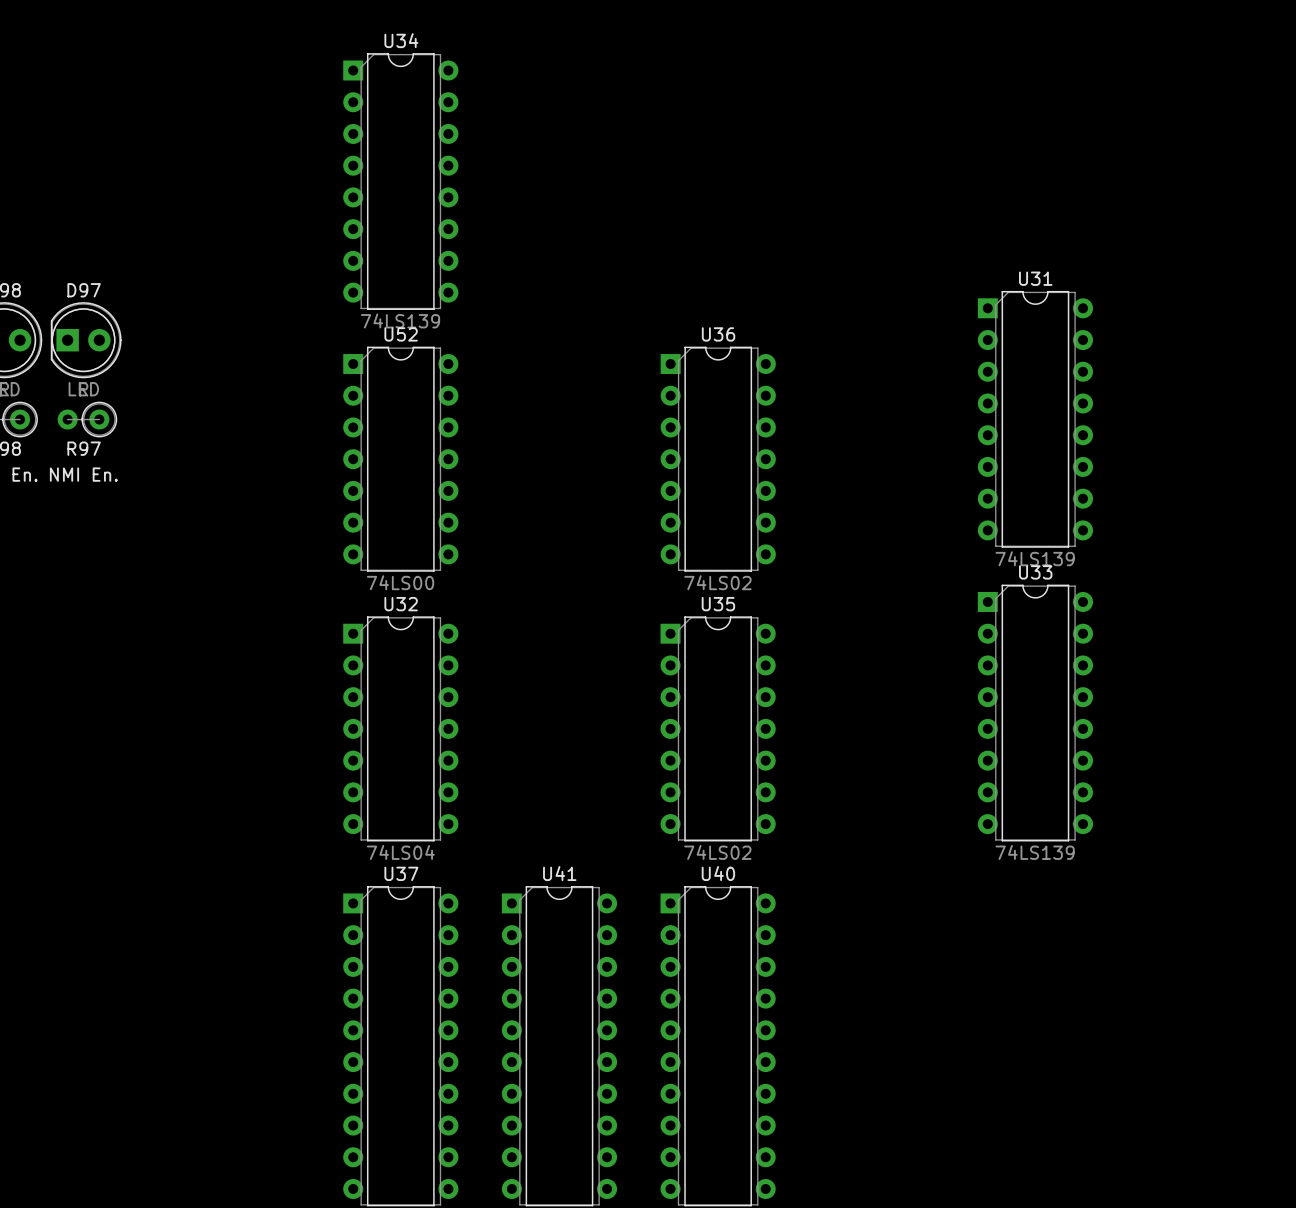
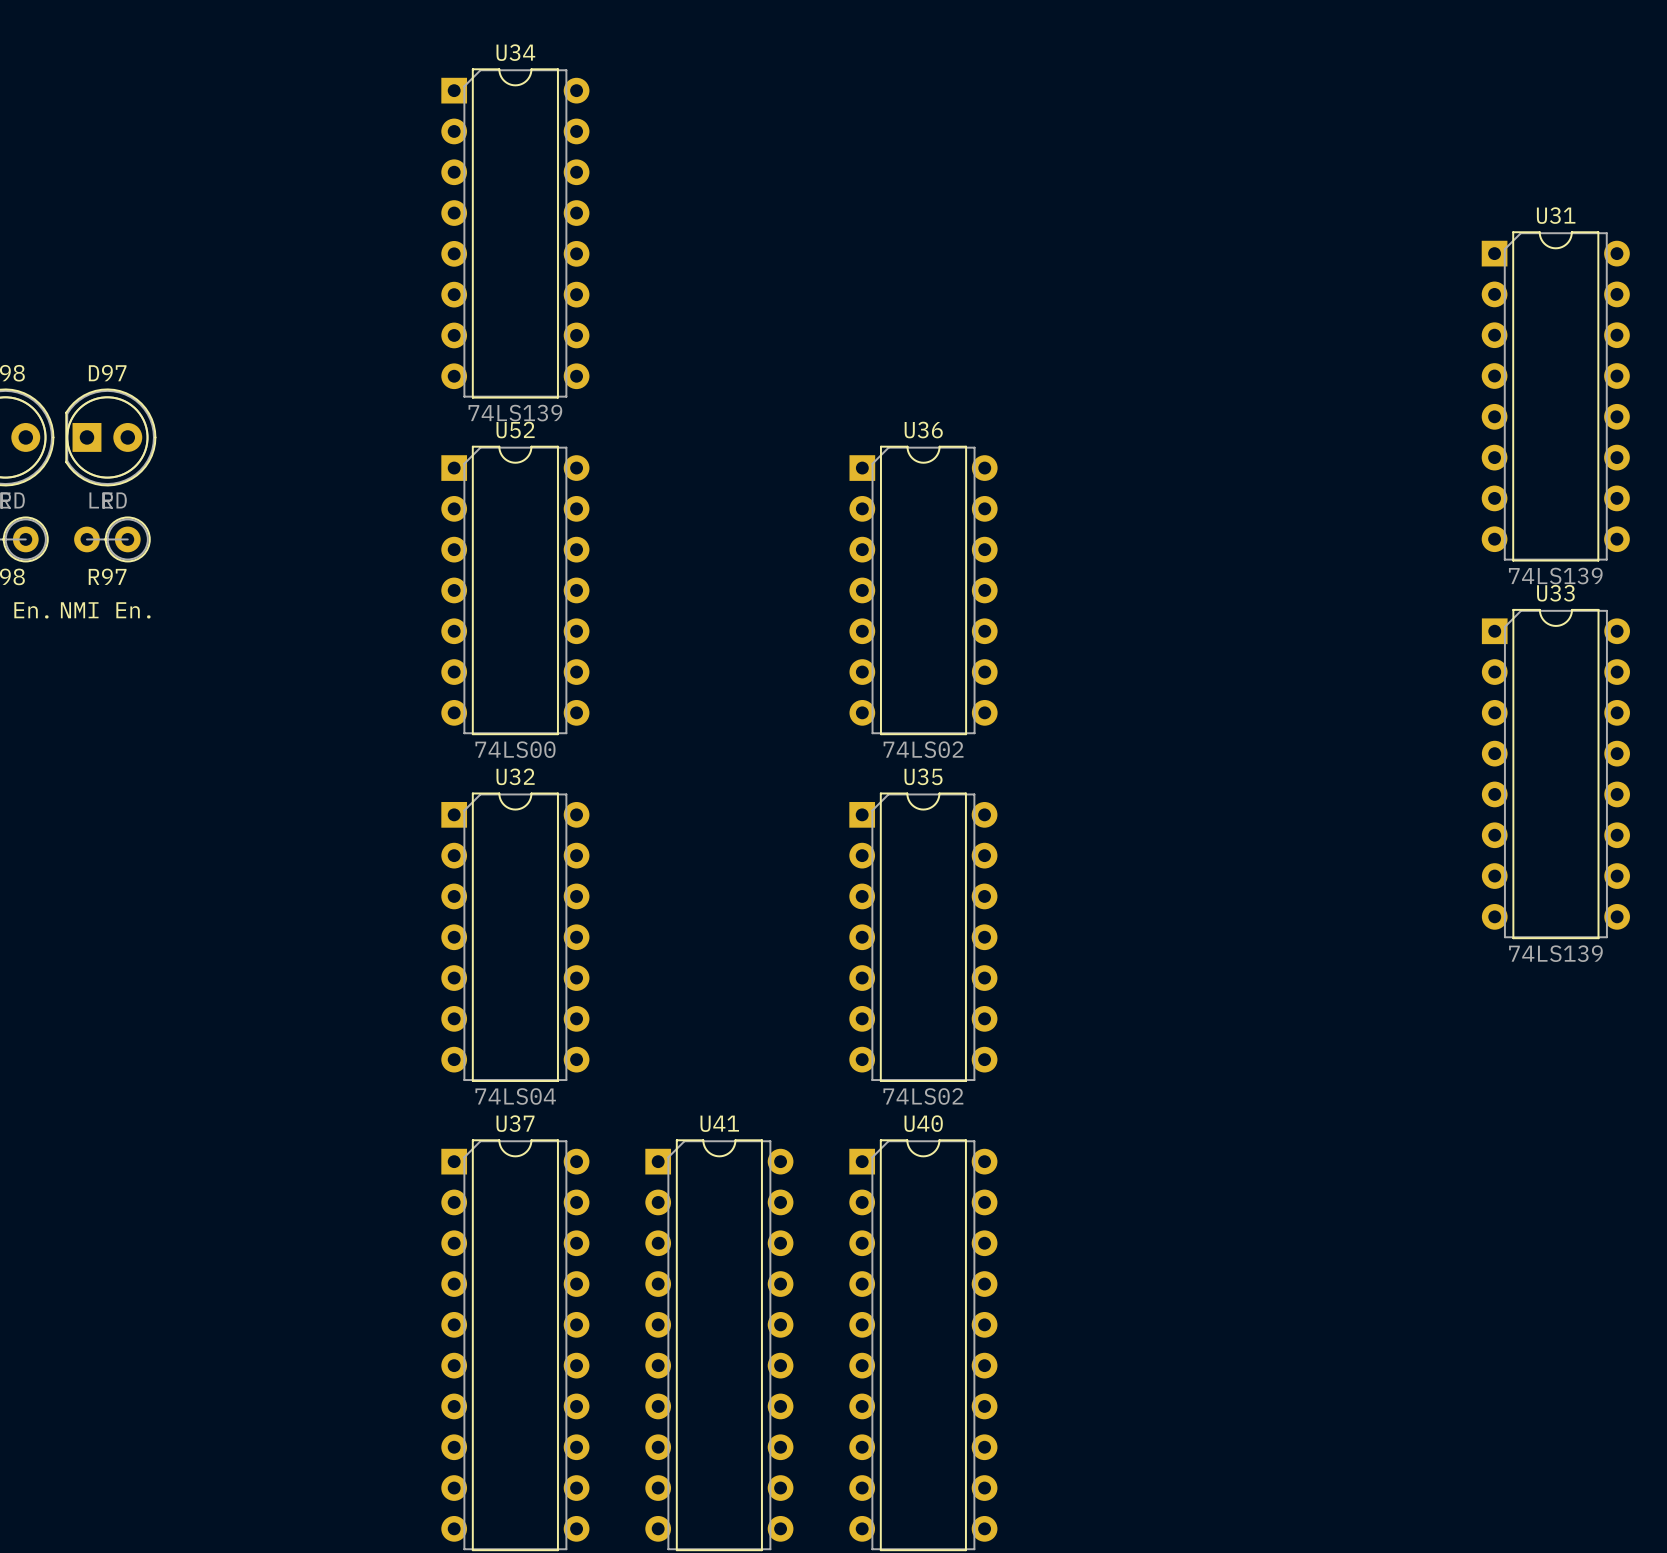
U31 position: (1035, 419) -> (1555, 396)
U33 position: (1035, 713) -> (1555, 774)

